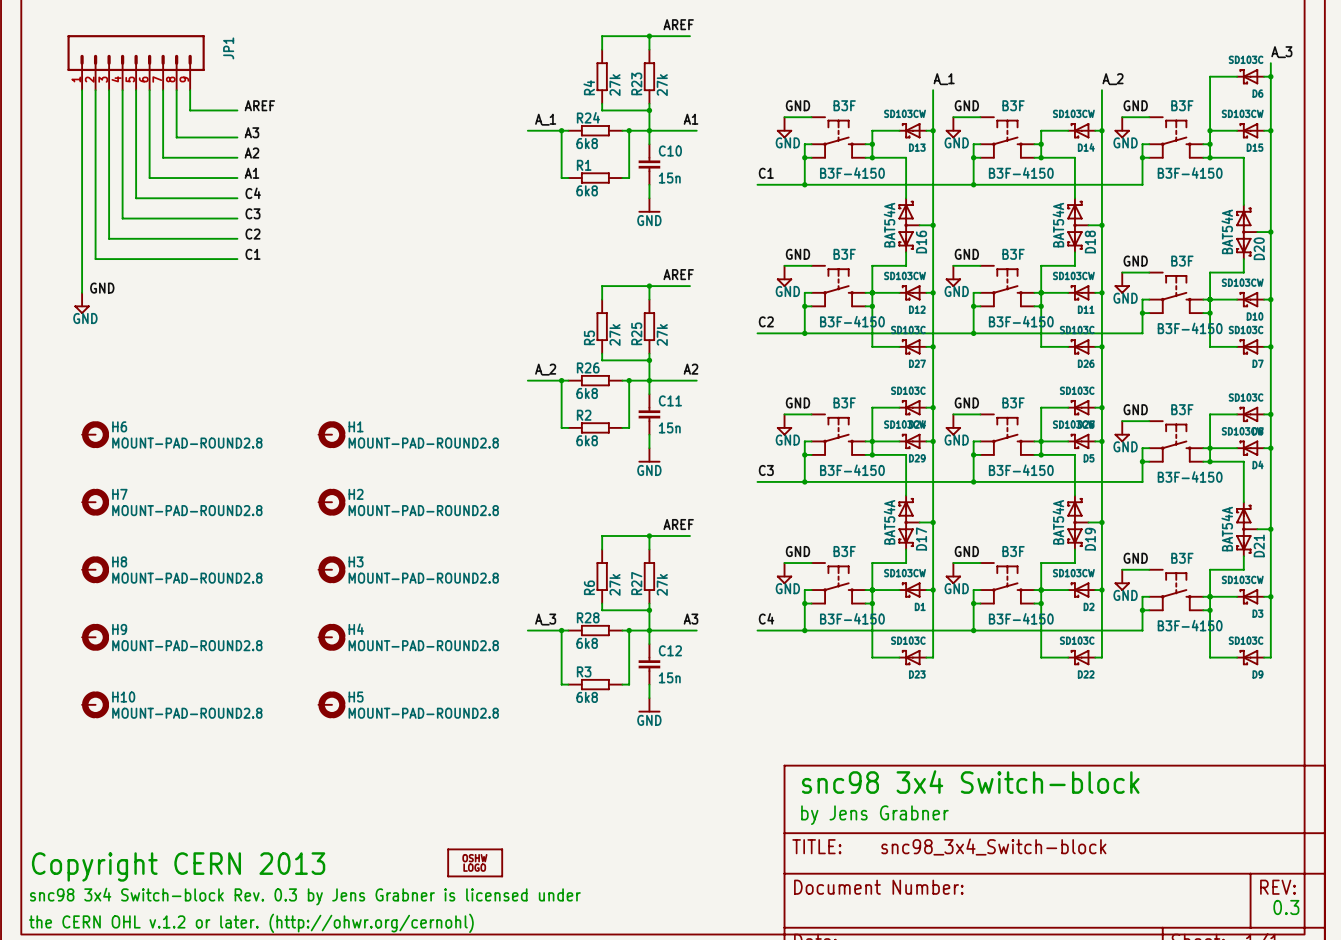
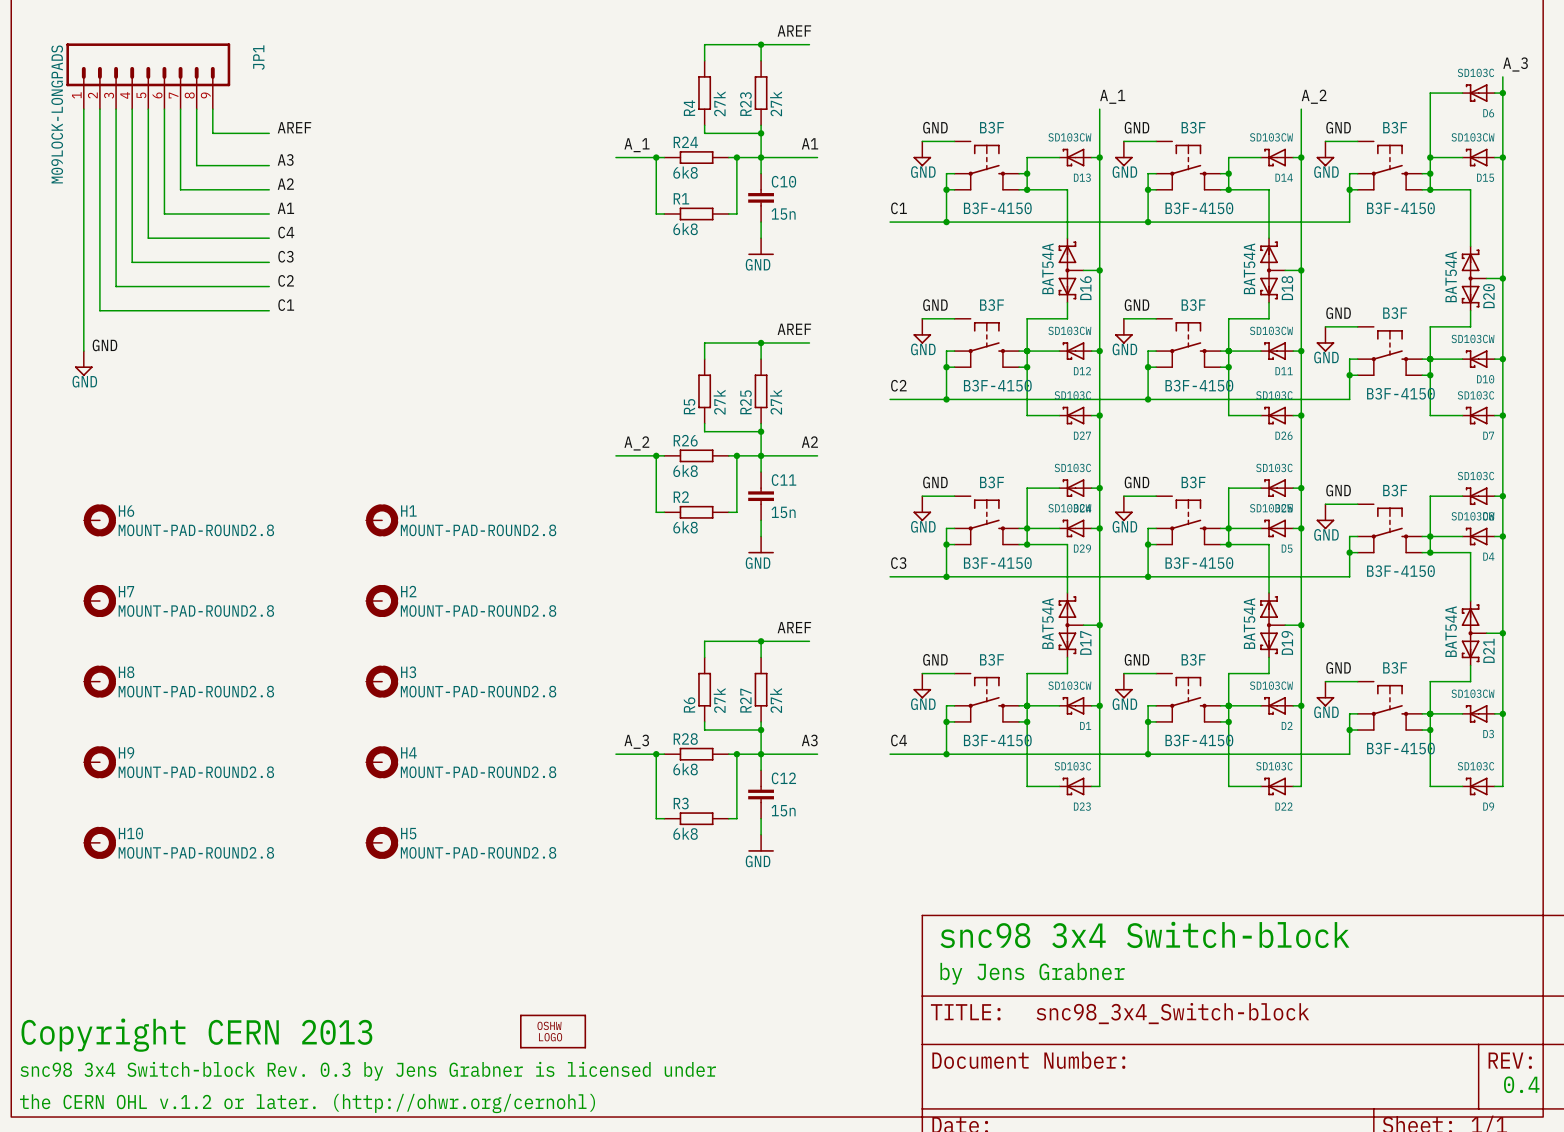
JP1 value: none -> M09LOCK-LONGPADS (57, 114)
text: 0.3 (1286, 907) -> 0.4 (1521, 1084)

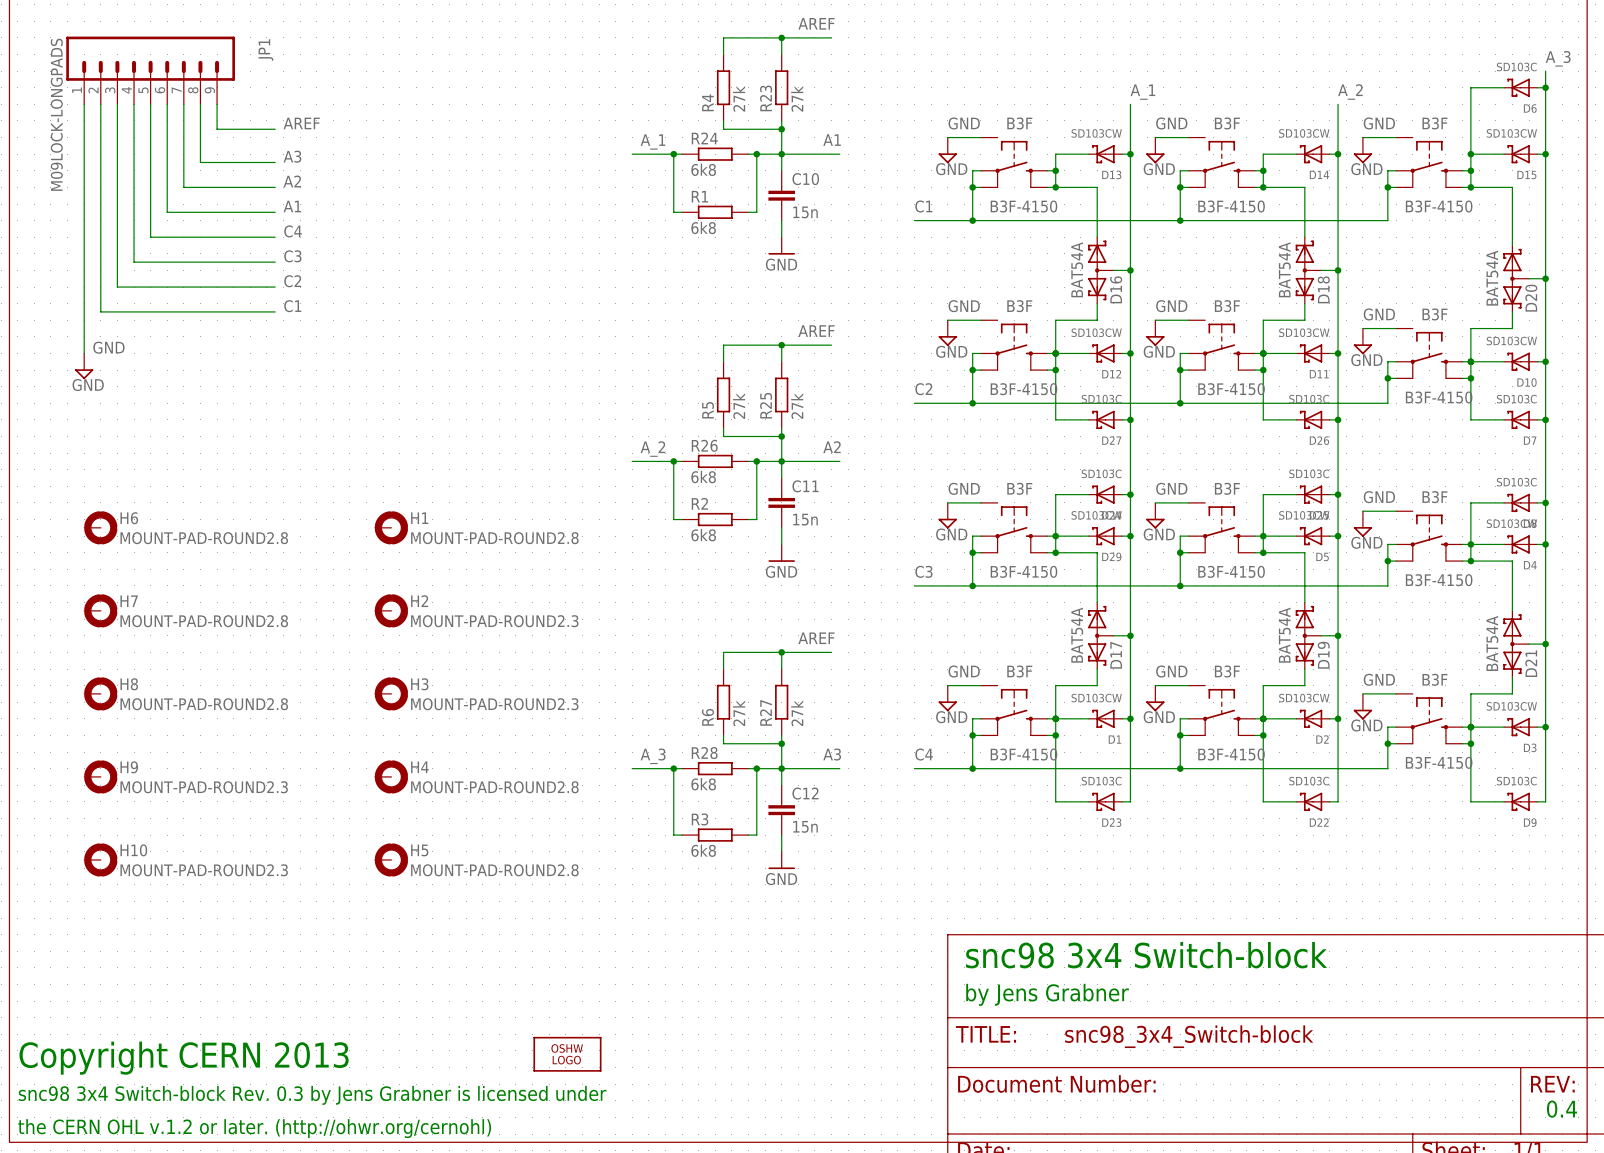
H2 value: MOUNT-PAD-ROUND2.8 (478, 611) -> MOUNT-PAD-ROUND2.3 (494, 621)
H3 value: MOUNT-PAD-ROUND2.8 (478, 691) -> MOUNT-PAD-ROUND2.3 (494, 704)
H9 value: MOUNT-PAD-ROUND2.8 (196, 772) -> MOUNT-PAD-ROUND2.3 (204, 787)
H10 value: MOUNT-PAD-ROUND2.8 (196, 852) -> MOUNT-PAD-ROUND2.3 (204, 870)

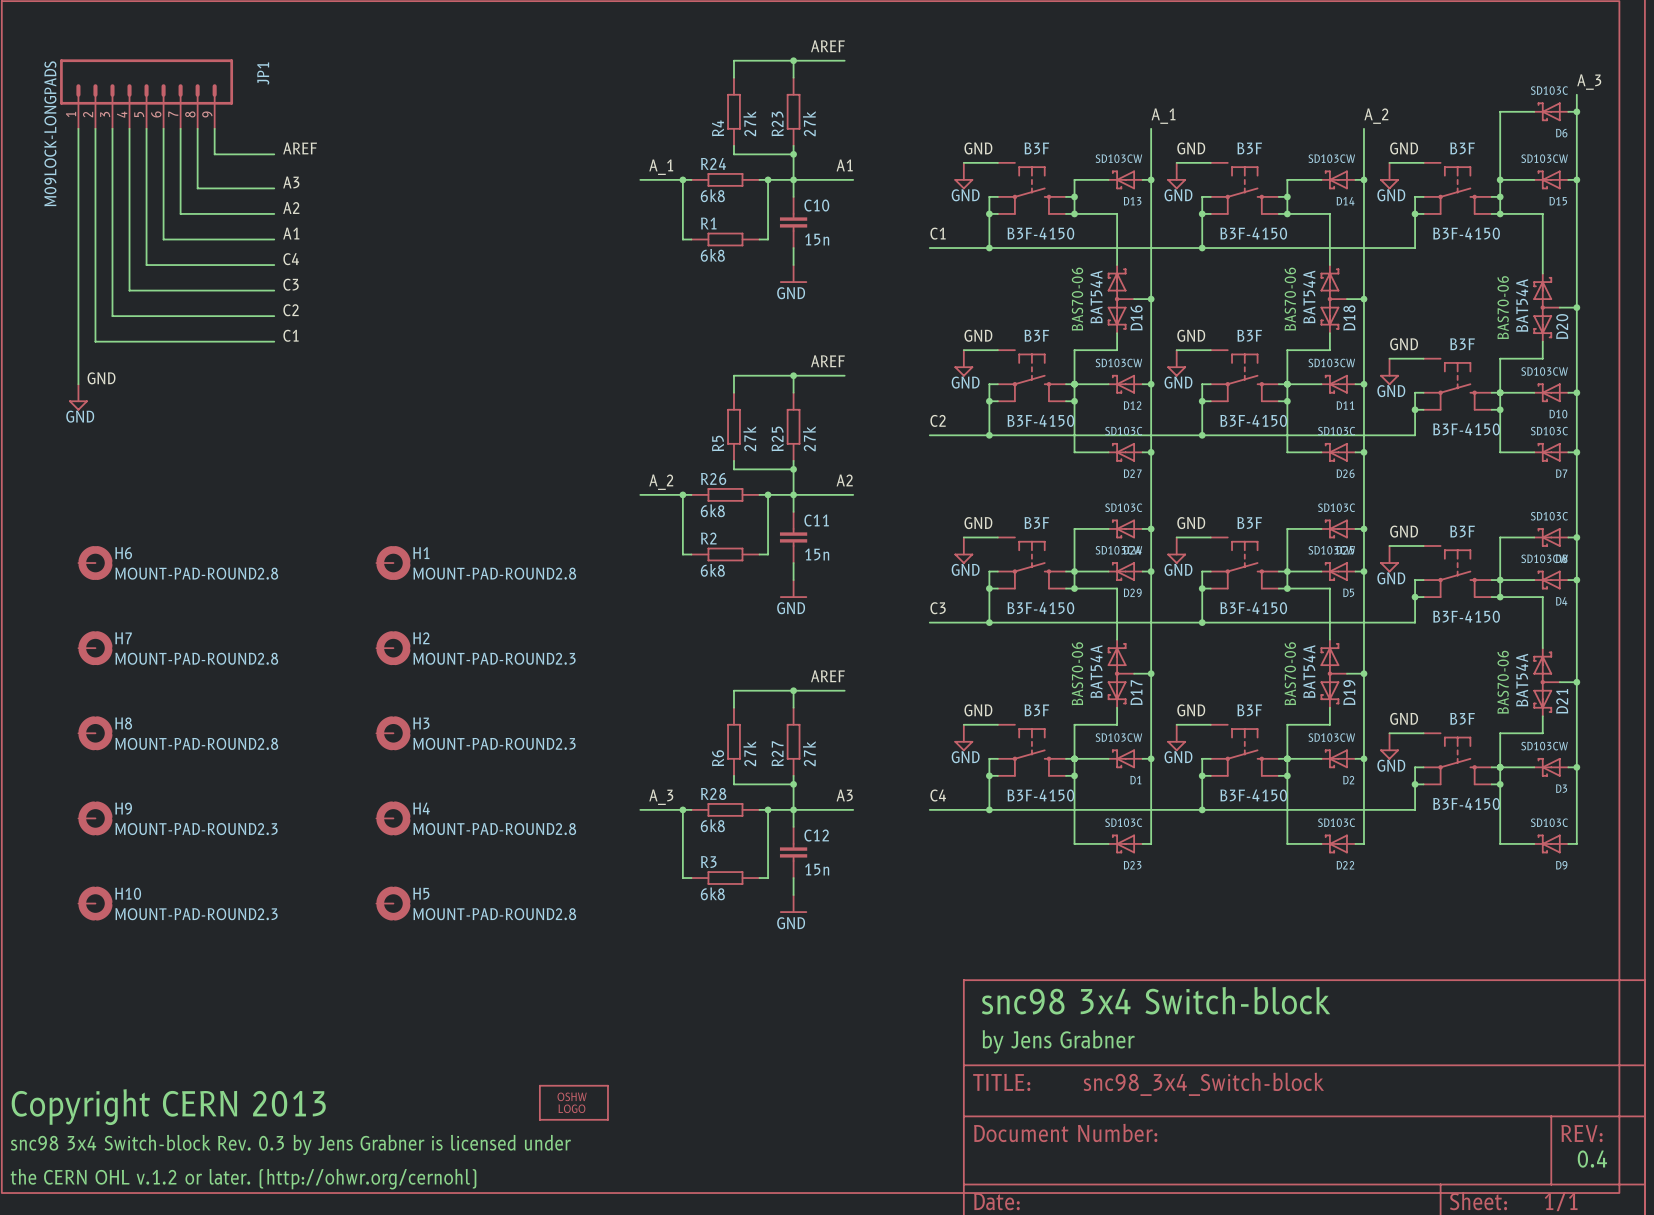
text: none -> BAS70-06 (1077, 299)
text: none -> BAS70-06 (1290, 299)
text: none -> BAS70-06 (1503, 307)
text: none -> BAS70-06 (1077, 673)
text: none -> BAS70-06 (1290, 673)
text: none -> BAS70-06 (1503, 682)

